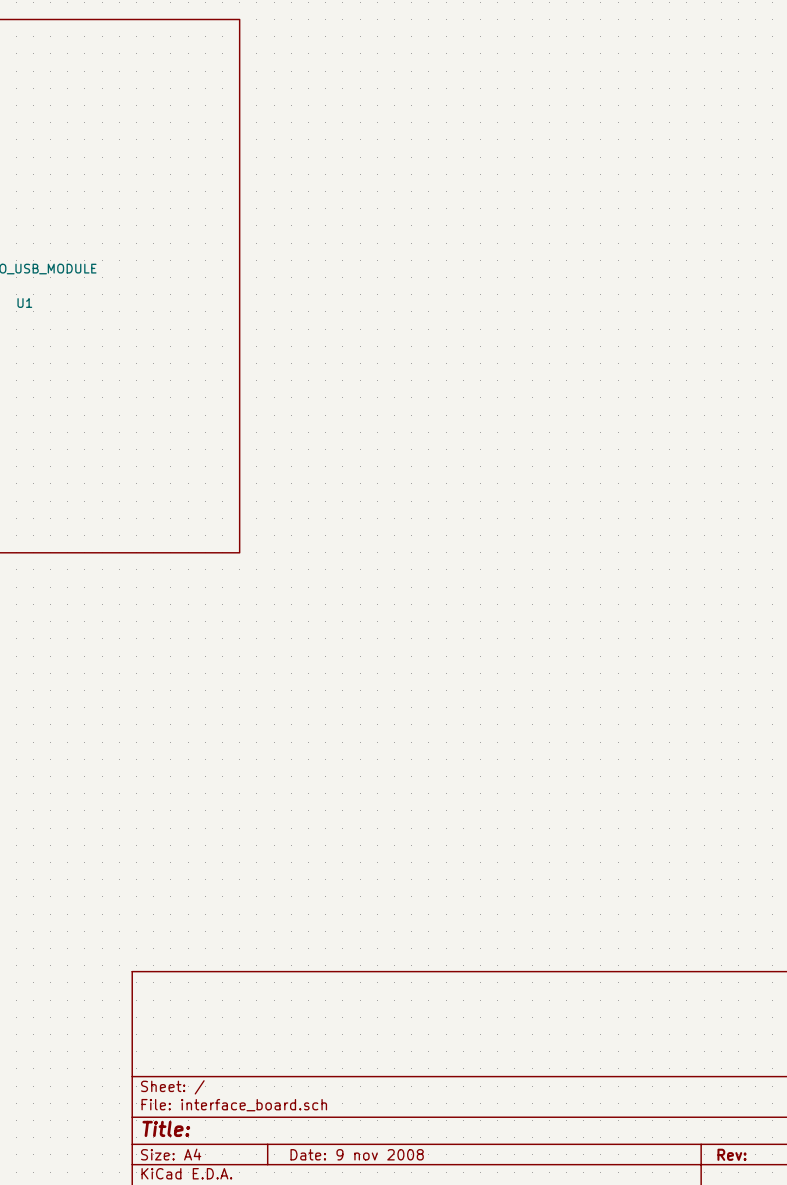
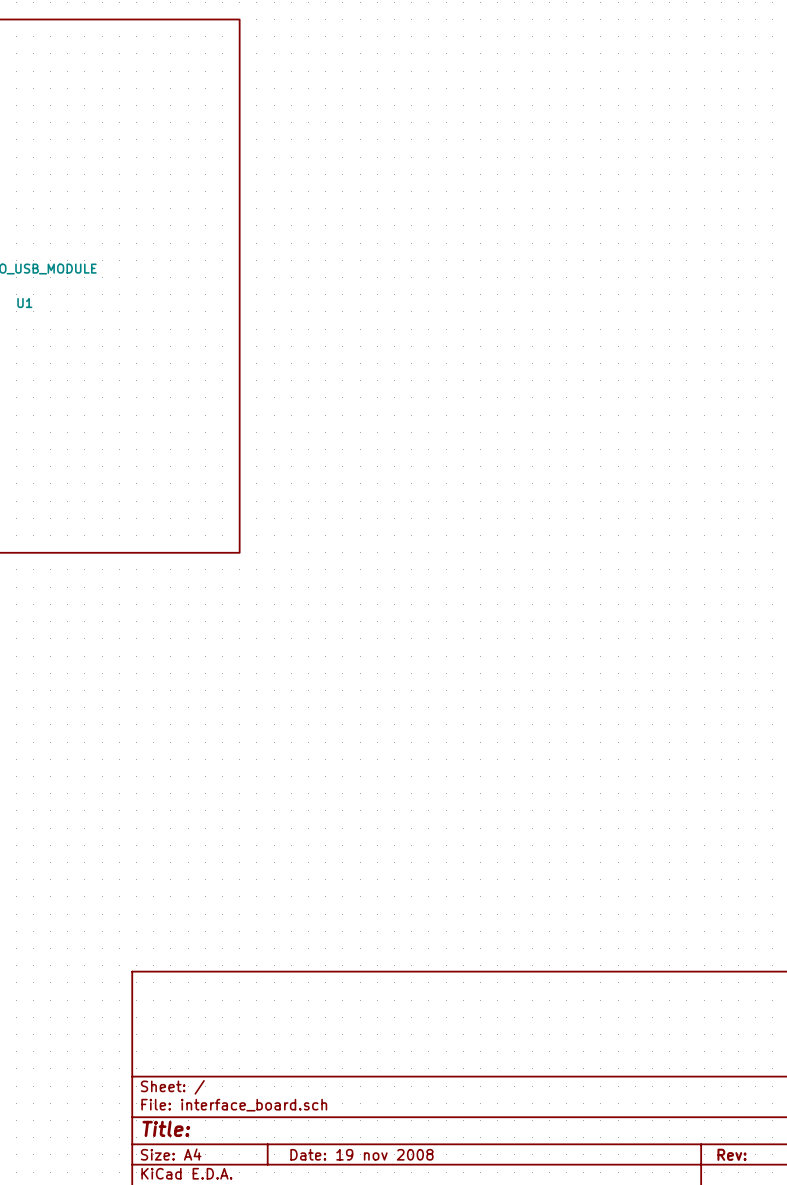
title block: Date: 9 nov 2008 (357, 1154) -> Date: 19 nov 2008 (361, 1154)

